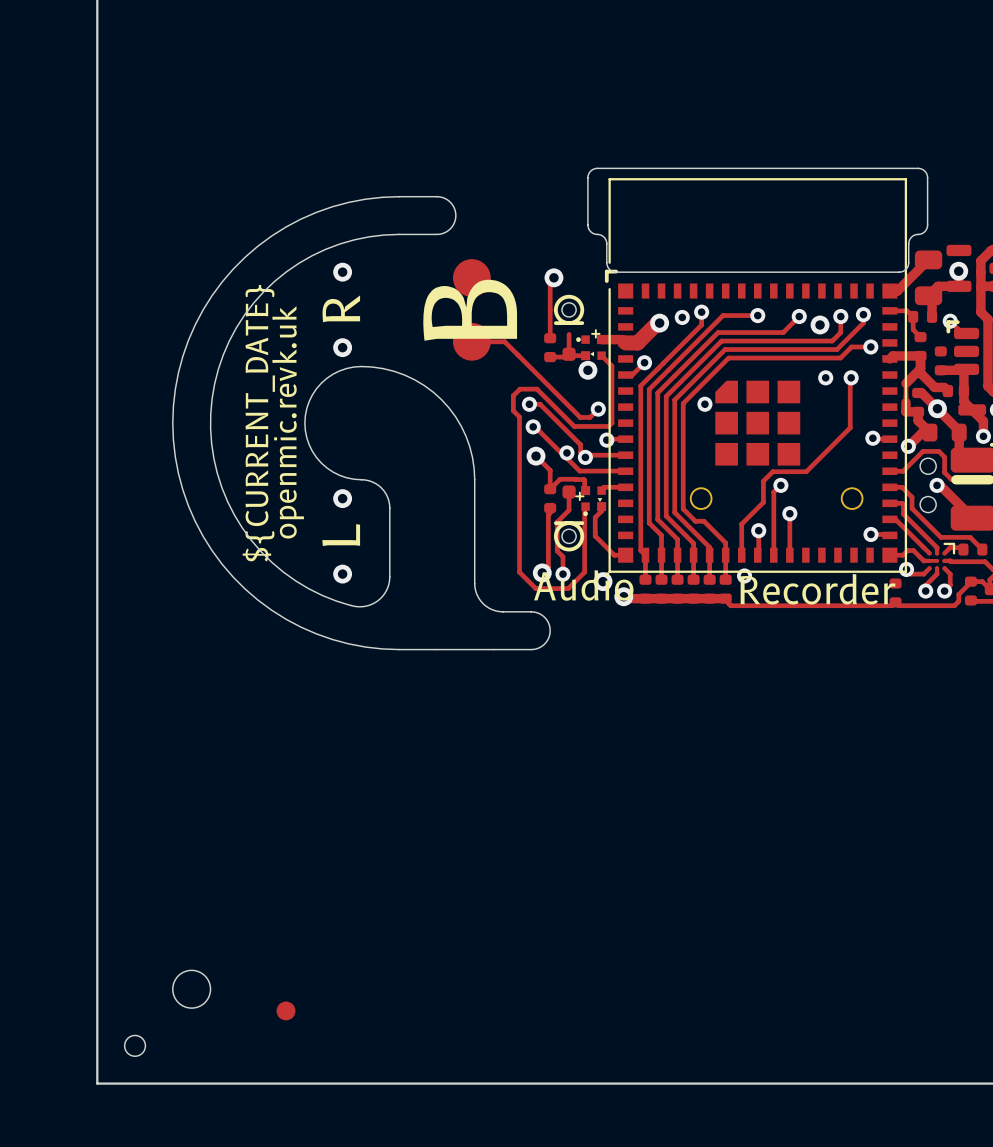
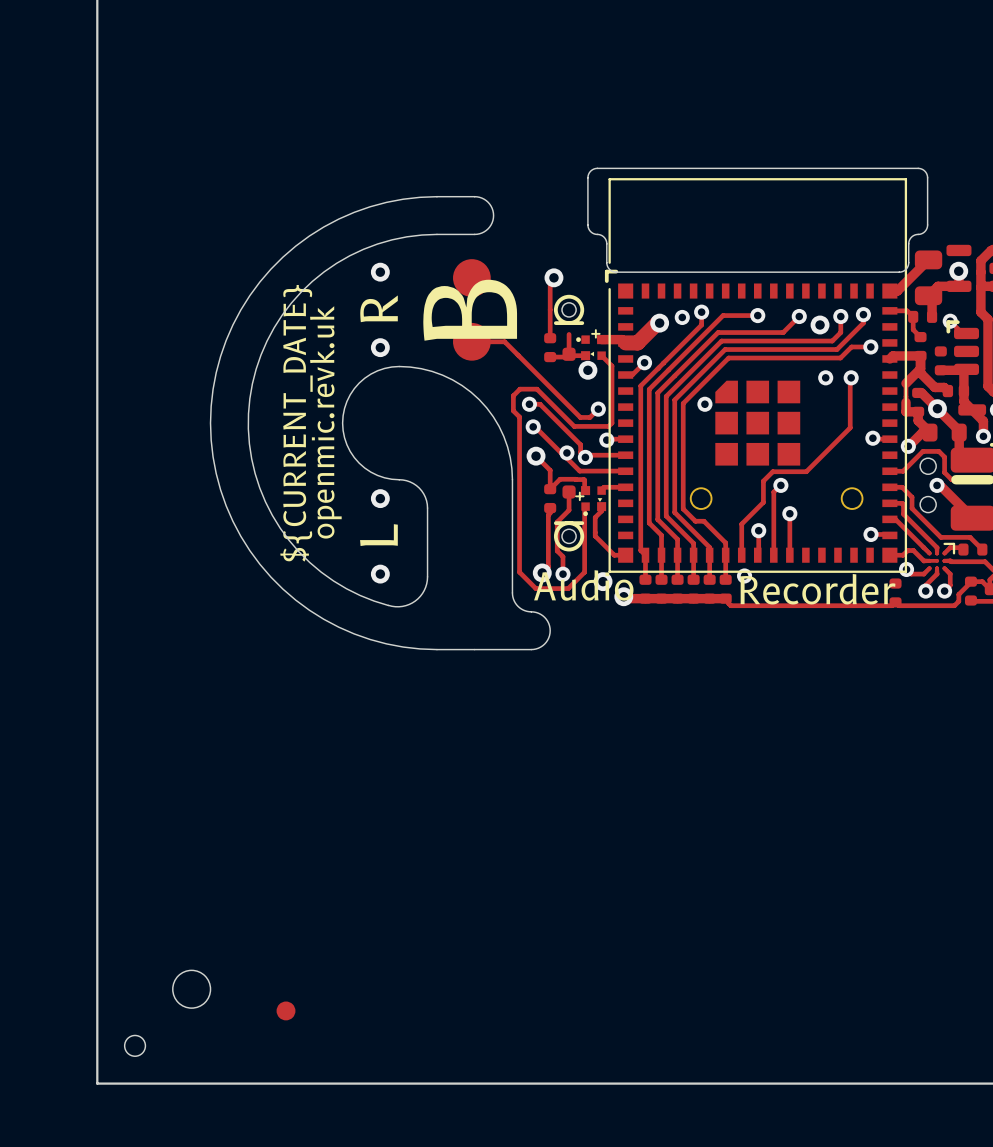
via position: (342, 272) -> (380, 272)
text position: R (341, 308) -> R (379, 308)
via position: (342, 347) -> (380, 347)
text position: openmic.revk.uk (288, 422) -> openmic.revk.uk (325, 422)
text position: ${CURRENT_DATE} (258, 423) -> ${CURRENT_DATE} (296, 423)
via position: (342, 498) -> (380, 498)
text position: L (341, 535) -> L (378, 535)
via position: (342, 574) -> (380, 574)
board edge: (350, 605) (361, 606) (374, 602) (382, 596) (387, 587) (389, 576) (388, 500) (383, 490) (375, 483) (339, 475) (321, 463) (309, 444) (304, 423) (309, 401) (321, 383) (339, 370) (361, 366) (383, 368) (414, 379) (433, 392) (455, 416) (466, 436) (474, 468) (474, 583) (476, 594) (485, 605) (495, 610) (531, 611) -> (388, 605) (402, 606) (412, 602) (420, 596) (425, 587) (427, 576) (426, 500) (421, 490) (413, 483) (377, 475) (359, 463) (346, 444) (342, 423) (346, 401) (359, 383) (377, 370) (399, 366) (432, 371) (462, 385) (486, 407) (499, 426) (507, 446) (511, 468) (512, 597) (519, 607) (531, 611)
board edge: (350, 605) (322, 595) (295, 581) (272, 562) (242, 528) (222, 487) (213, 458) (210, 428) (214, 383) (223, 354) (236, 327) (253, 302) (274, 281) (312, 255) (339, 244) (384, 235) (436, 234) (446, 231) (454, 222) (455, 213) (450, 202) (441, 197) (382, 197) (348, 202) (300, 219) (258, 246) (222, 281) (195, 324) (178, 372) (172, 423) (178, 473) (195, 521) (222, 564) (258, 600) (300, 627) (332, 639) (382, 648) (436, 649) -> (388, 605) (360, 595) (321, 572) (289, 540) (272, 515) (259, 487) (251, 458) (248, 413) (252, 383) (261, 354) (274, 327) (291, 302) (312, 281) (336, 263) (377, 244) (421, 235) (474, 234) (484, 231) (492, 222) (493, 213) (488, 202) (479, 197) (420, 197) (386, 202) (338, 219) (295, 246) (259, 281) (232, 324) (216, 372) (211, 406) (213, 456) (226, 505) (240, 536) (270, 577) (295, 600) (338, 627) (386, 643) (436, 649)

